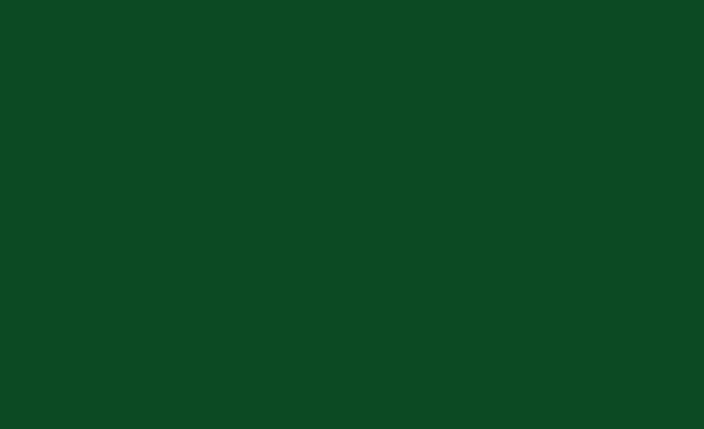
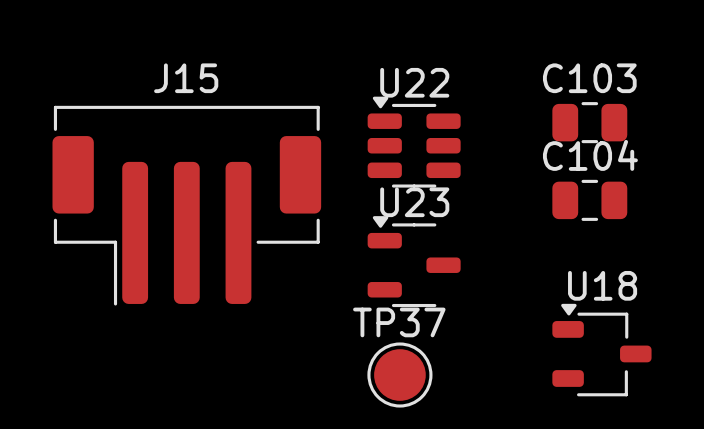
C103: none -> (589, 122)
U22: none -> (414, 142)
C104: none -> (589, 200)
J15: none -> (186, 205)
U23: none -> (414, 261)
U18: none -> (601, 350)
TP37: none -> (399, 375)

